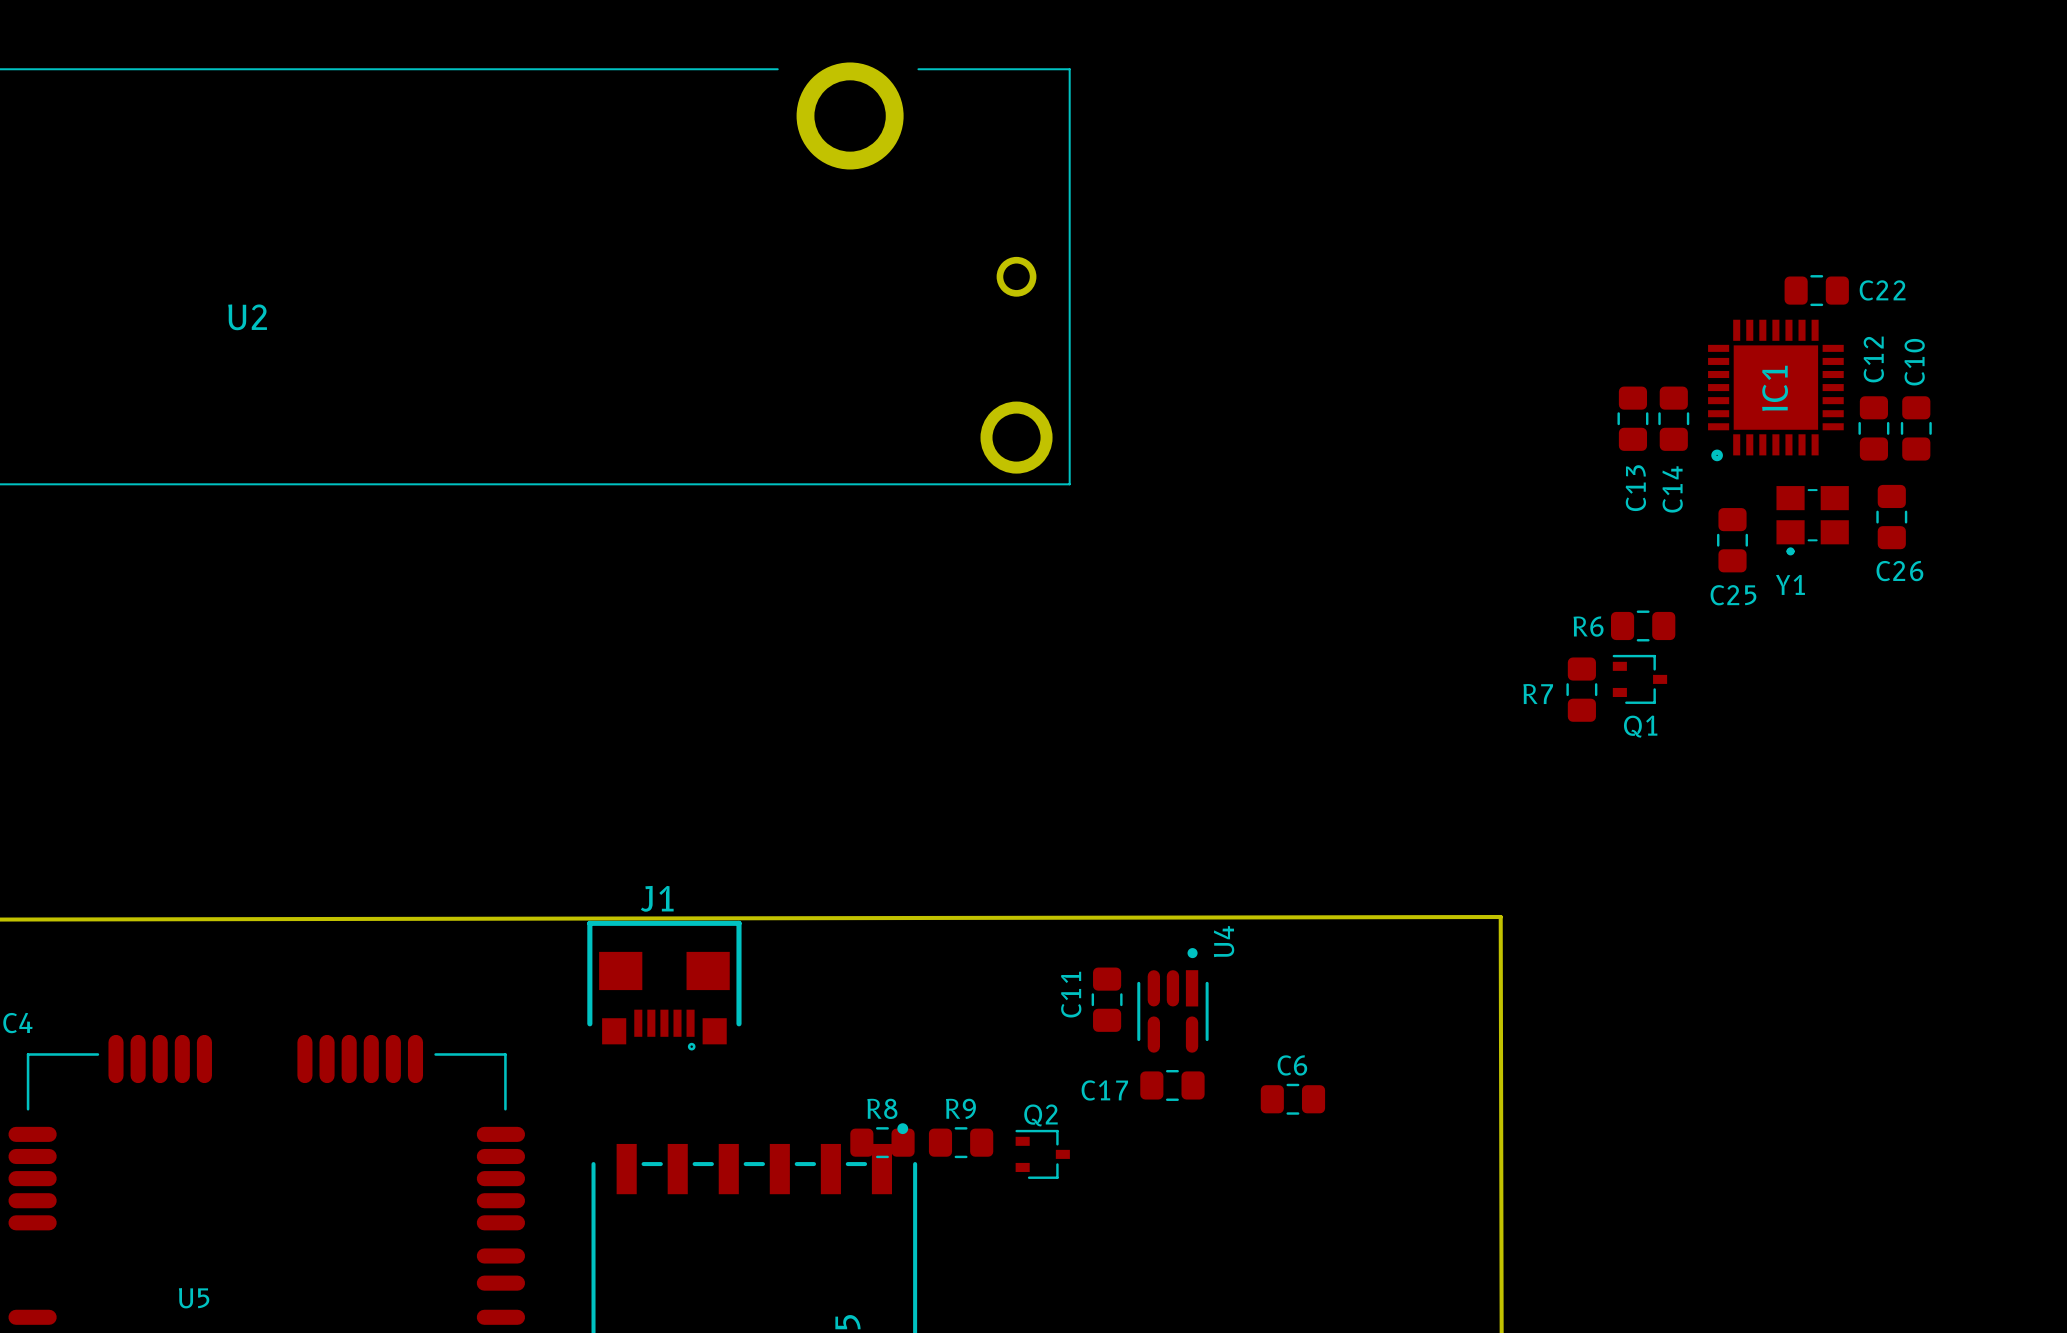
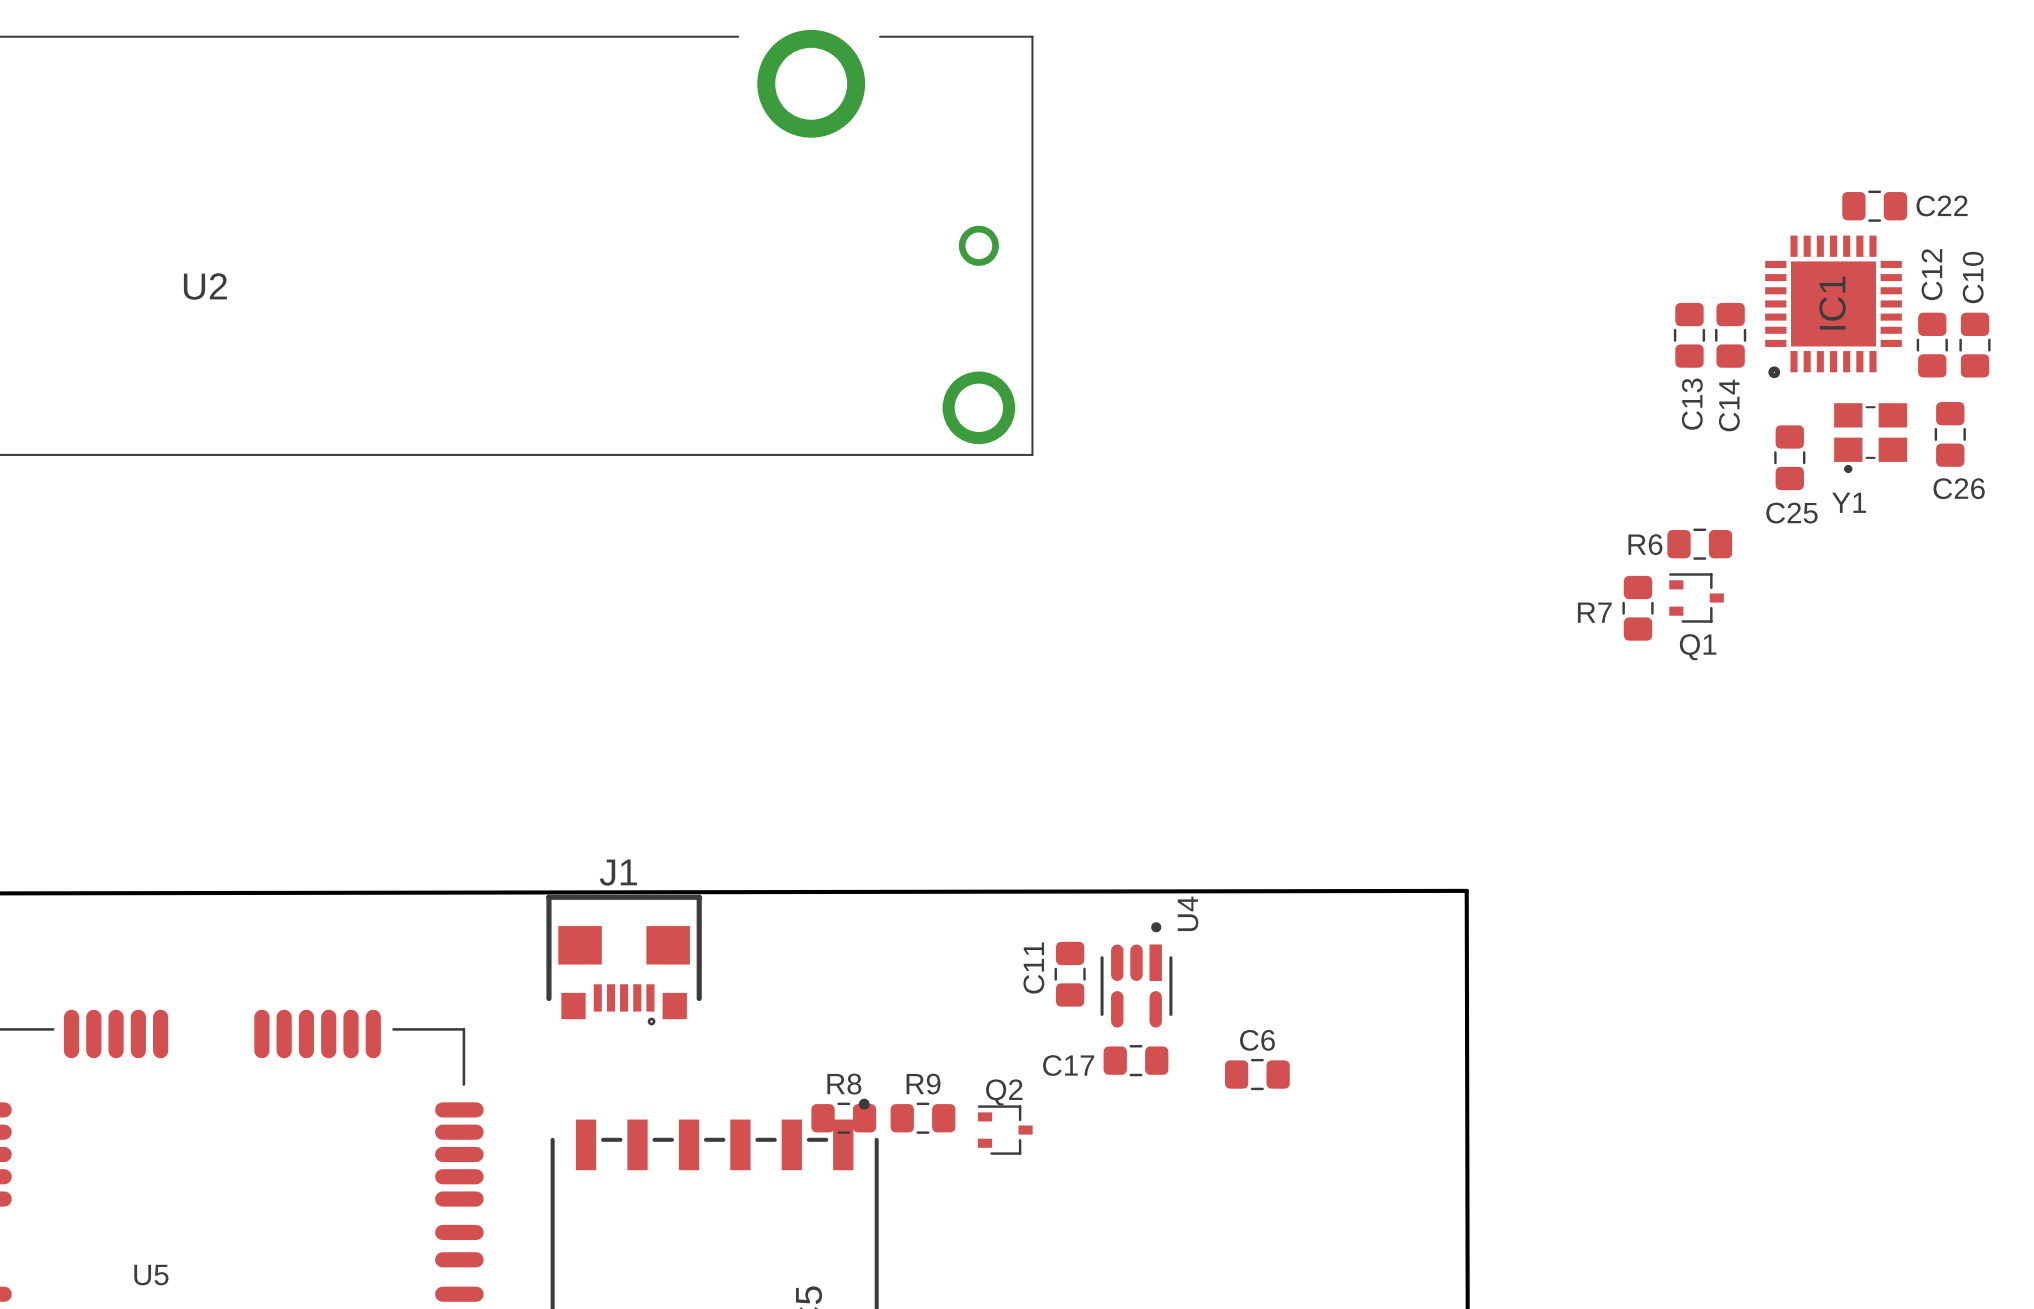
C22 position: (1816, 290) -> (1874, 206)
IC1 position: (1775, 390) -> (1833, 306)
C13 position: (1632, 418) -> (1689, 335)
C14 position: (1673, 418) -> (1730, 335)
C12 position: (1873, 428) -> (1932, 345)
C10 position: (1916, 428) -> (1974, 345)
C26 position: (1891, 517) -> (1950, 434)
Y1 position: (1812, 520) -> (1870, 438)
C25 position: (1732, 540) -> (1789, 457)
R6 position: (1643, 625) -> (1699, 544)
Q1 position: (1639, 679) -> (1696, 598)
R7 position: (1581, 689) -> (1638, 608)

